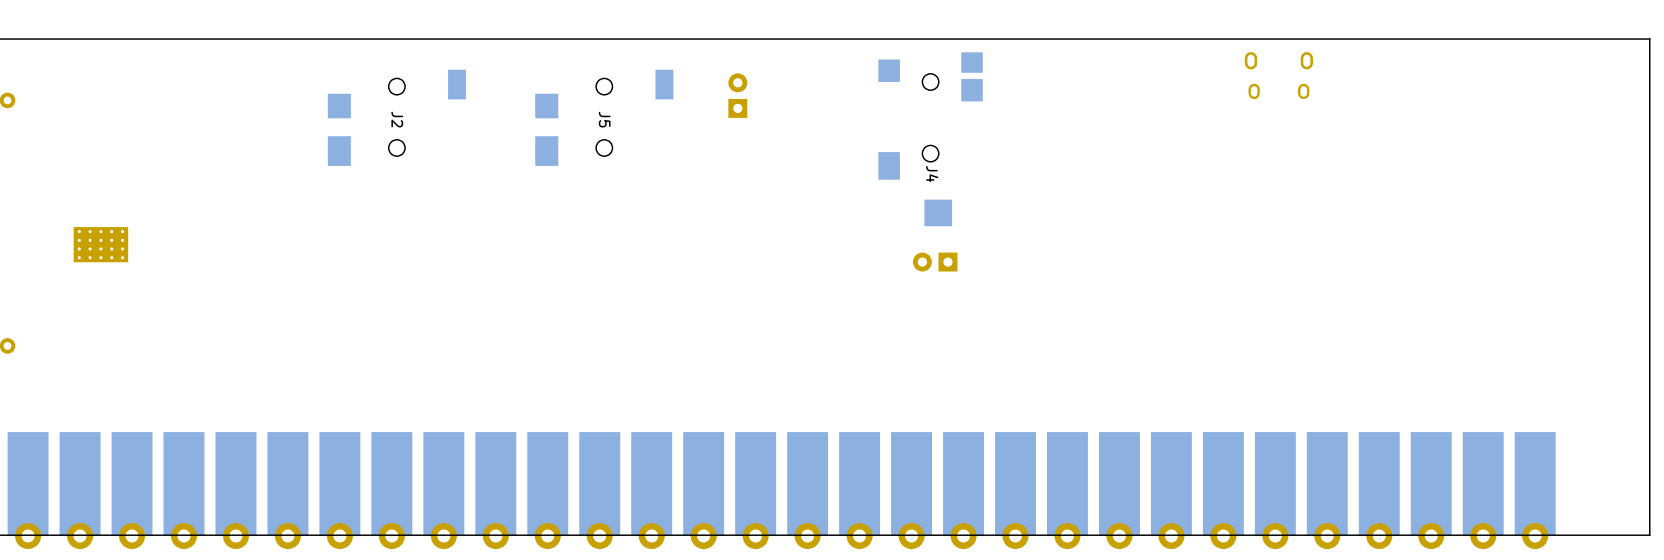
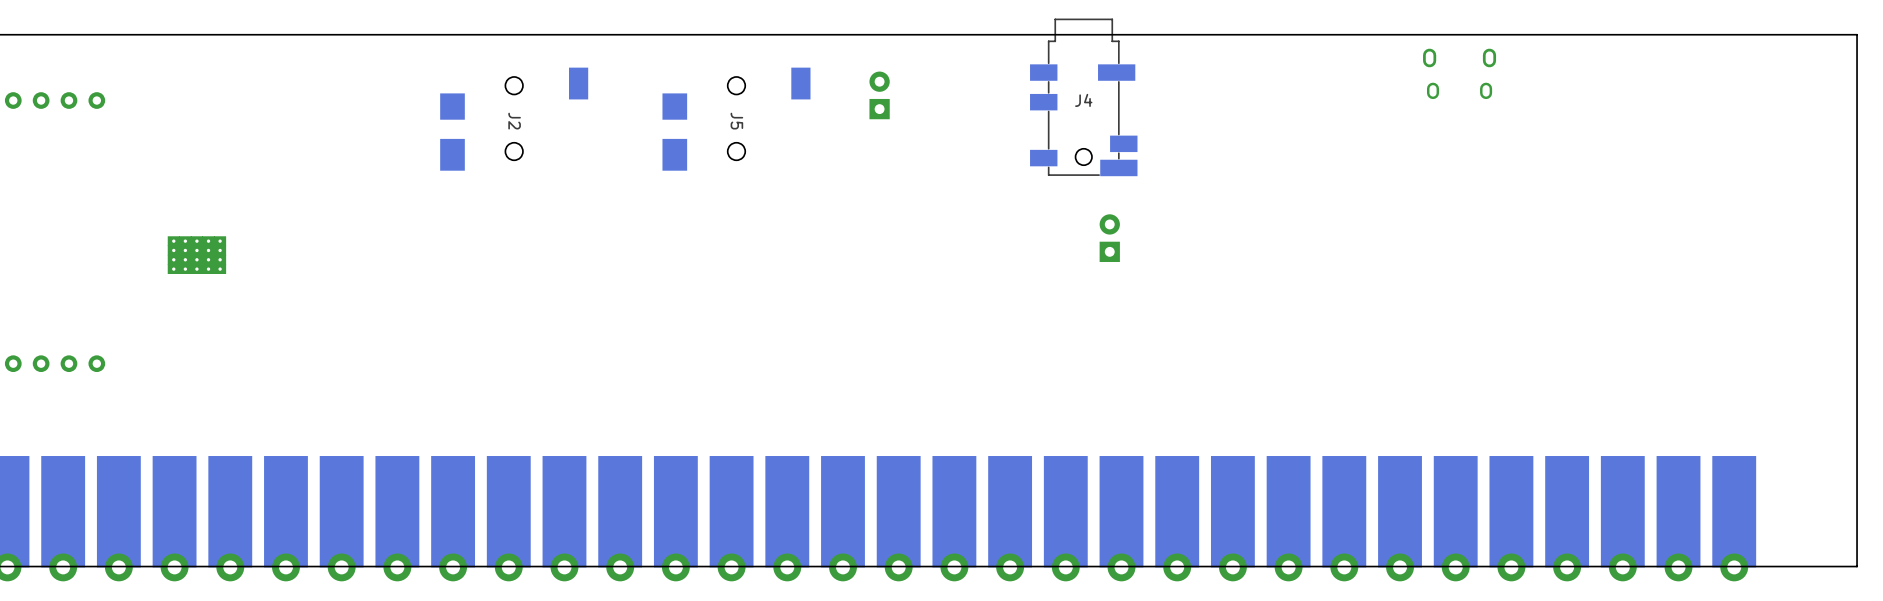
J4 footprint: [878, 52, 983, 227] -> [1030, 18, 1138, 177]
J4 name position: J4 (932, 174) -> J4 (1083, 100)
part rotation: 0° (935, 262) -> 90° clockwise (1109, 238)
part position: (935, 262) -> (1109, 238)

